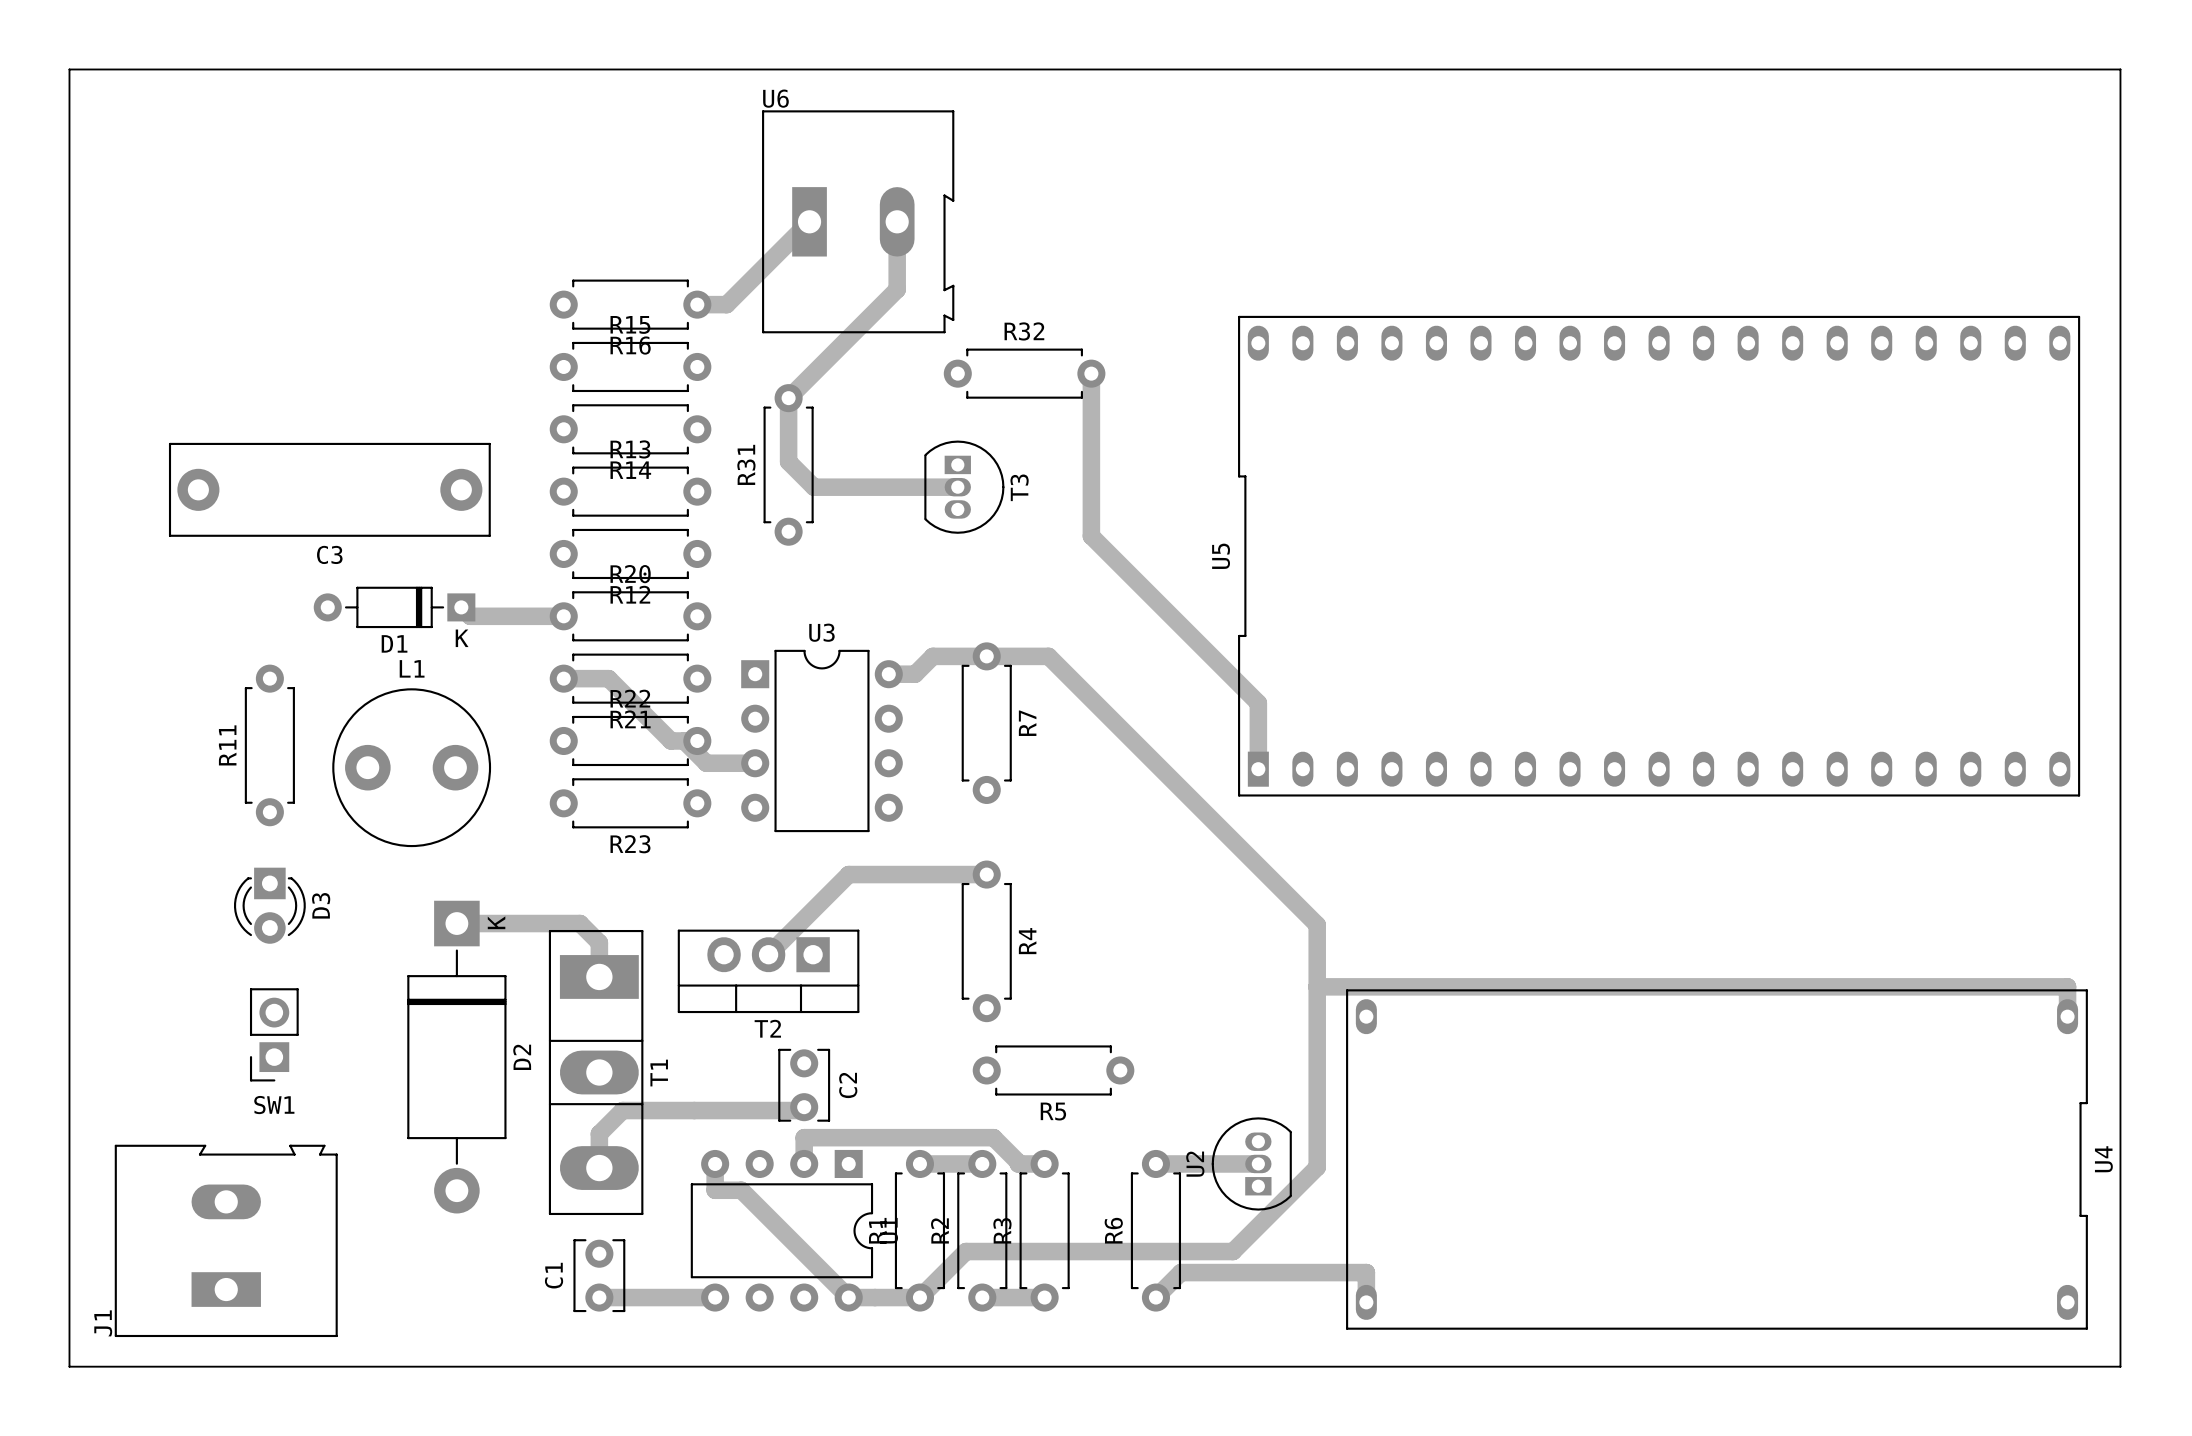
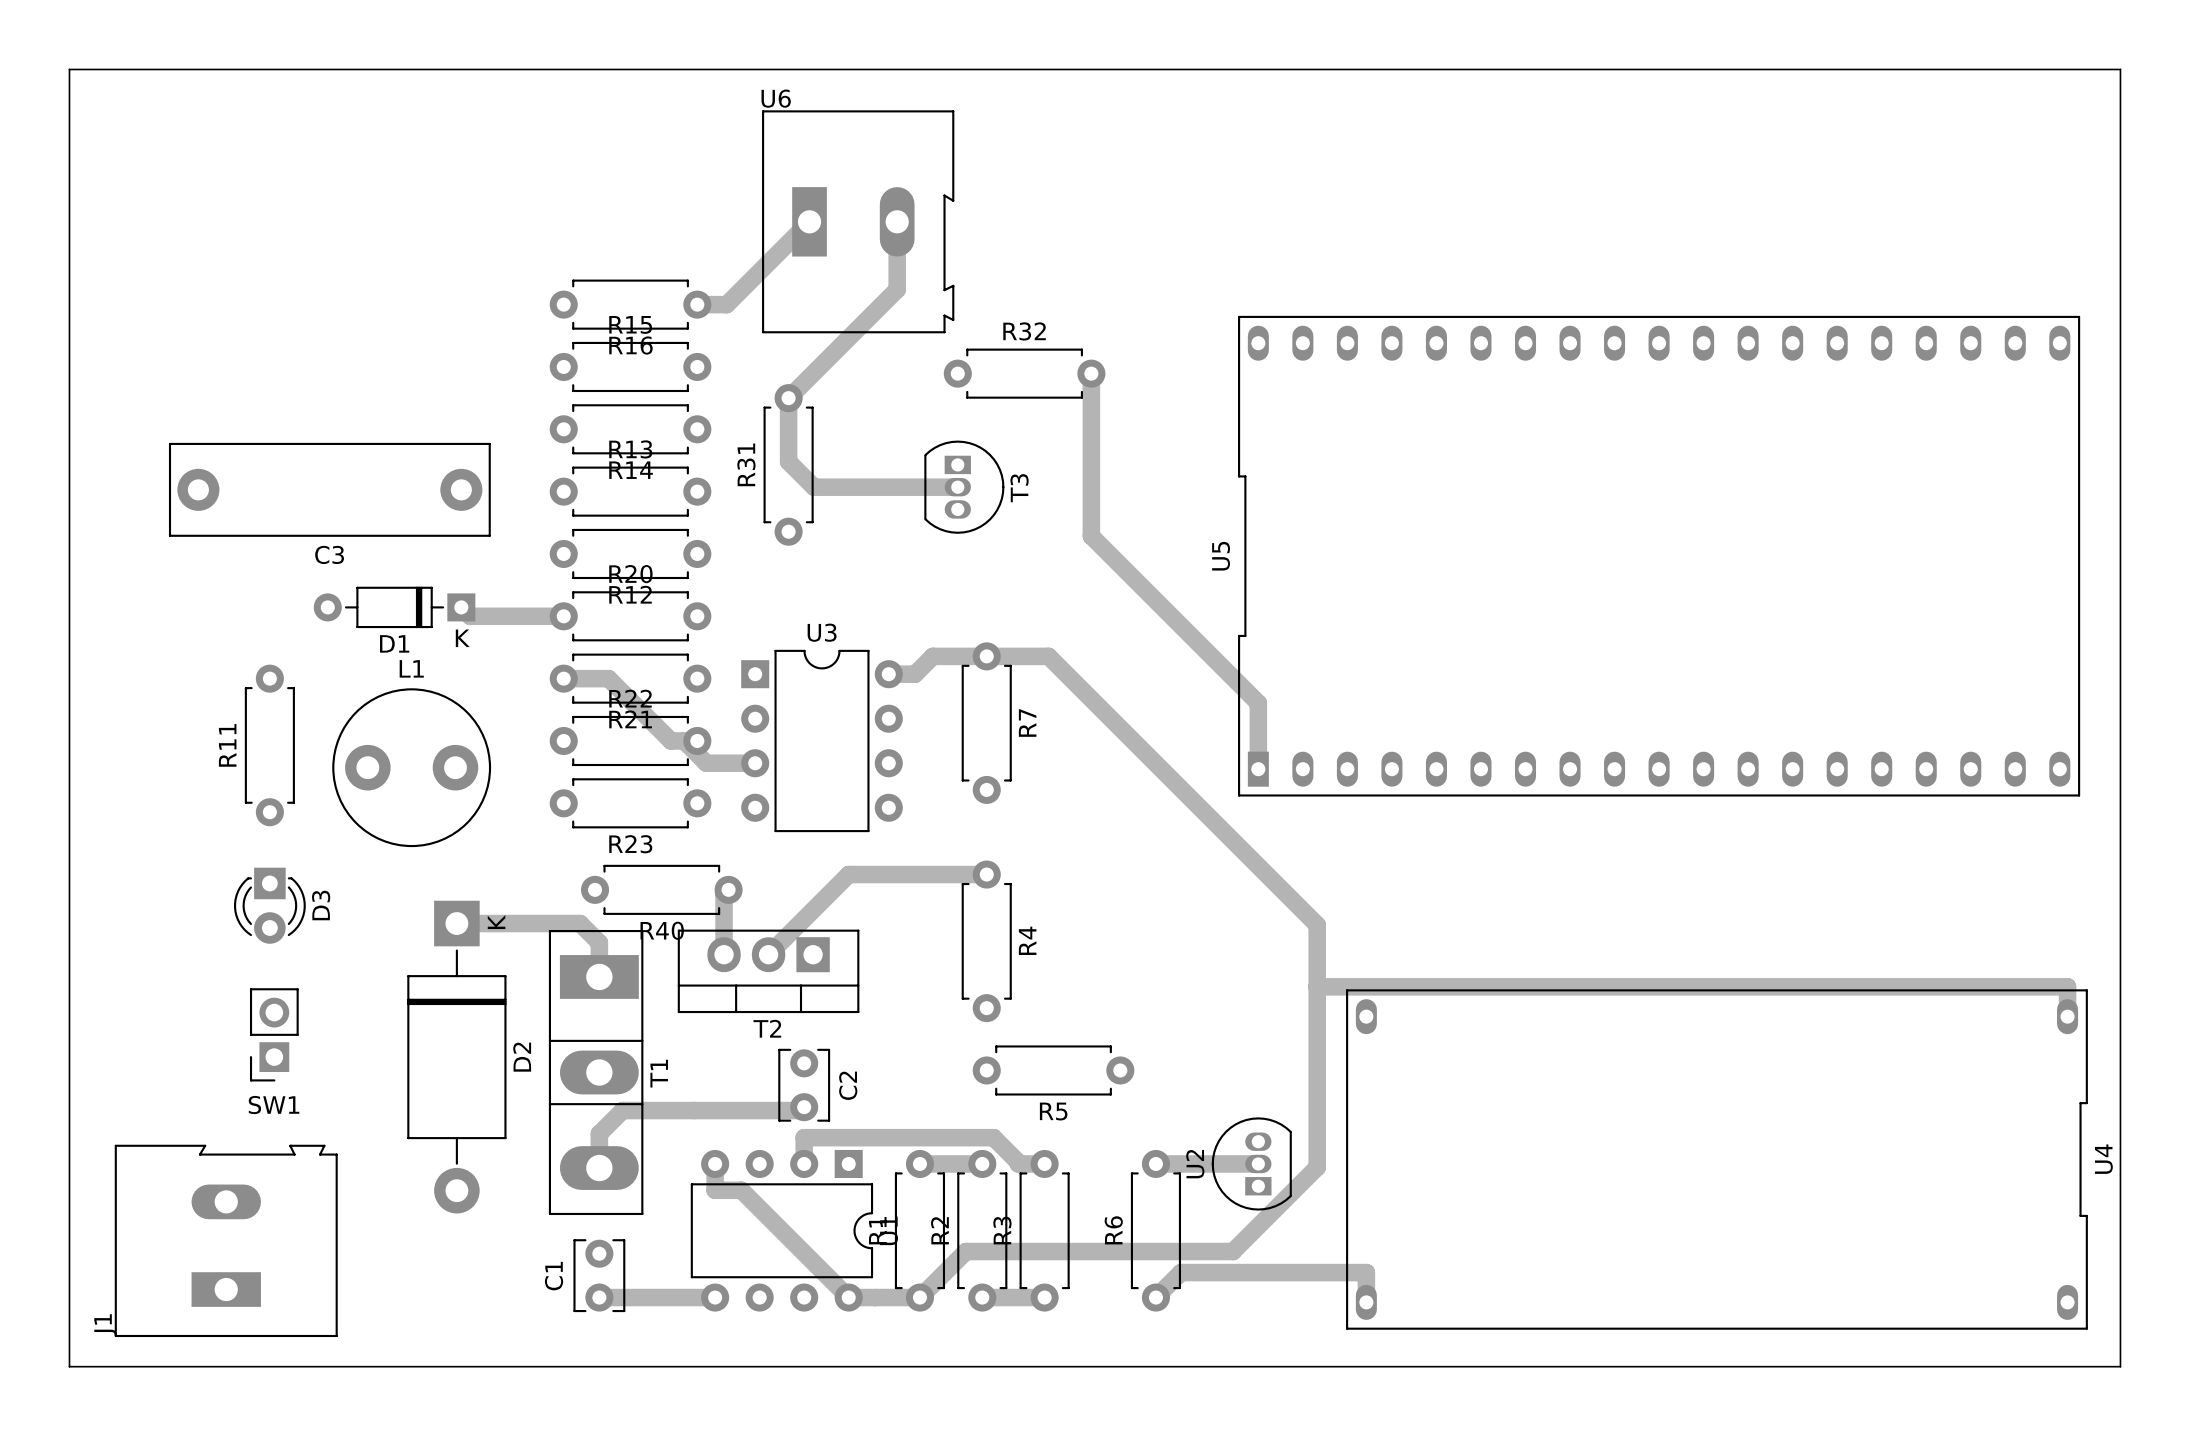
R40: none -> (661, 889)
track: none -> (728, 889) (724, 894) (724, 954)

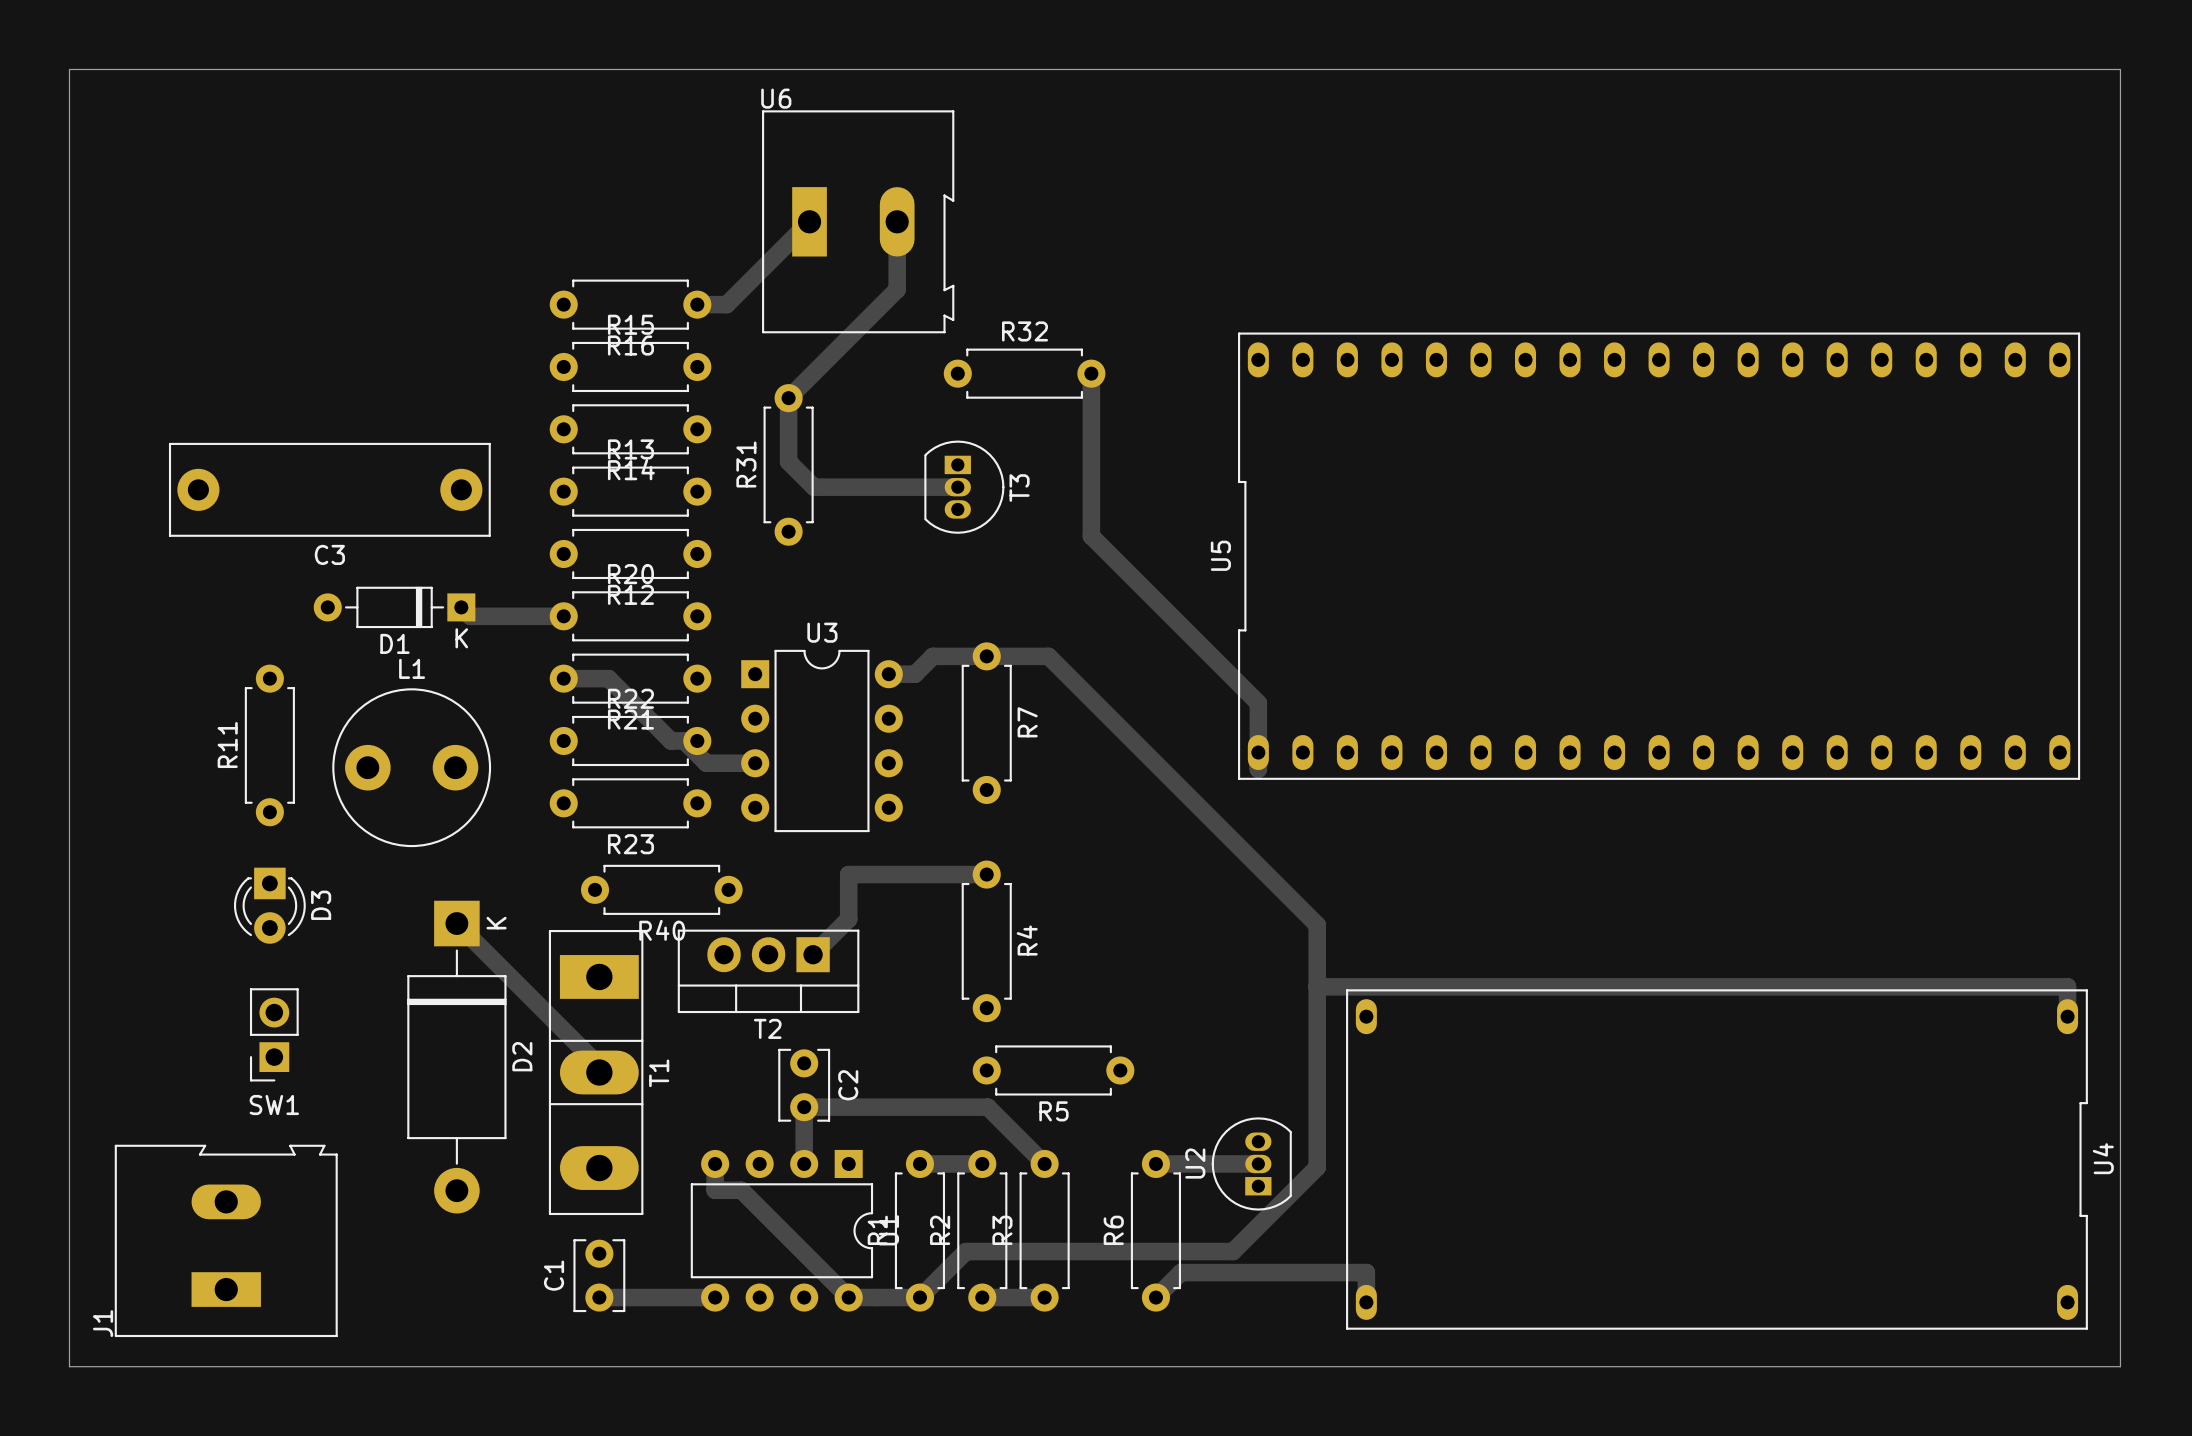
U5 footprint: [1238, 315, 2081, 797] -> [1238, 332, 2081, 780]
track: (848, 874) (768, 954) -> (848, 874) (848, 919) (813, 954)
track: (724, 894) (724, 954) -> none
track: (456, 923) (580, 923) (599, 942) (599, 976) -> (456, 923) (599, 1066) (599, 1072)
track: (804, 1110) (622, 1110) (599, 1133) (599, 1168) -> none
track: (804, 1137) (993, 1137) (1018, 1163) (1044, 1163) -> (804, 1137) (804, 1107) (987, 1107) (1044, 1163)

